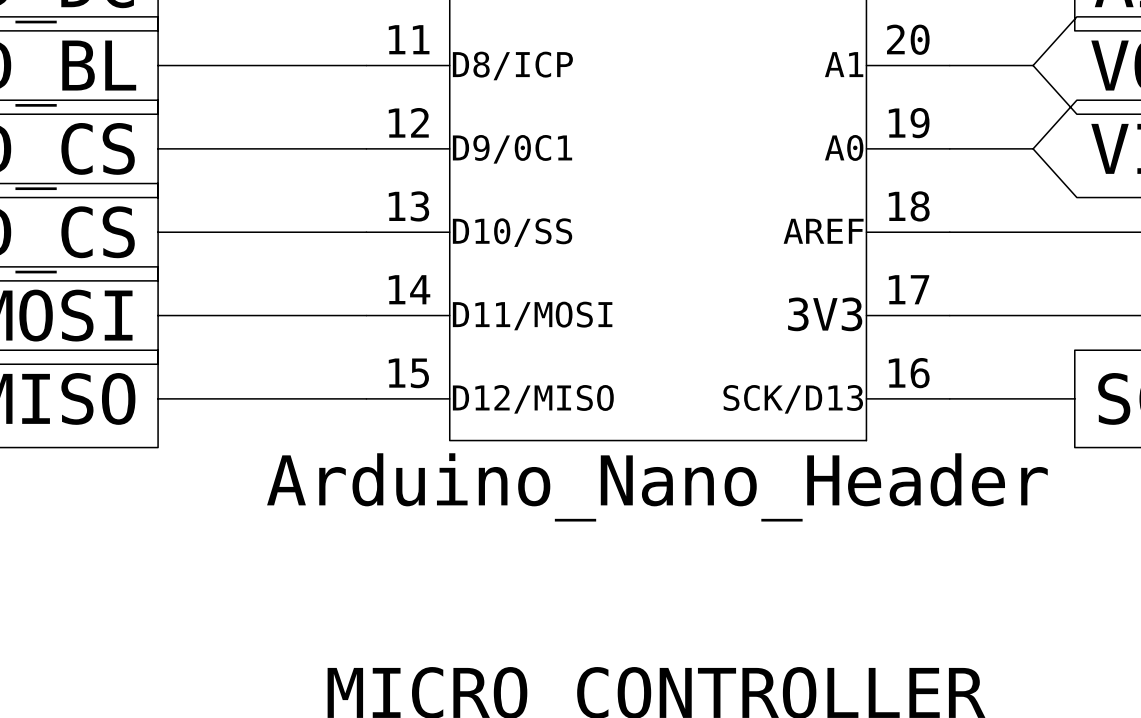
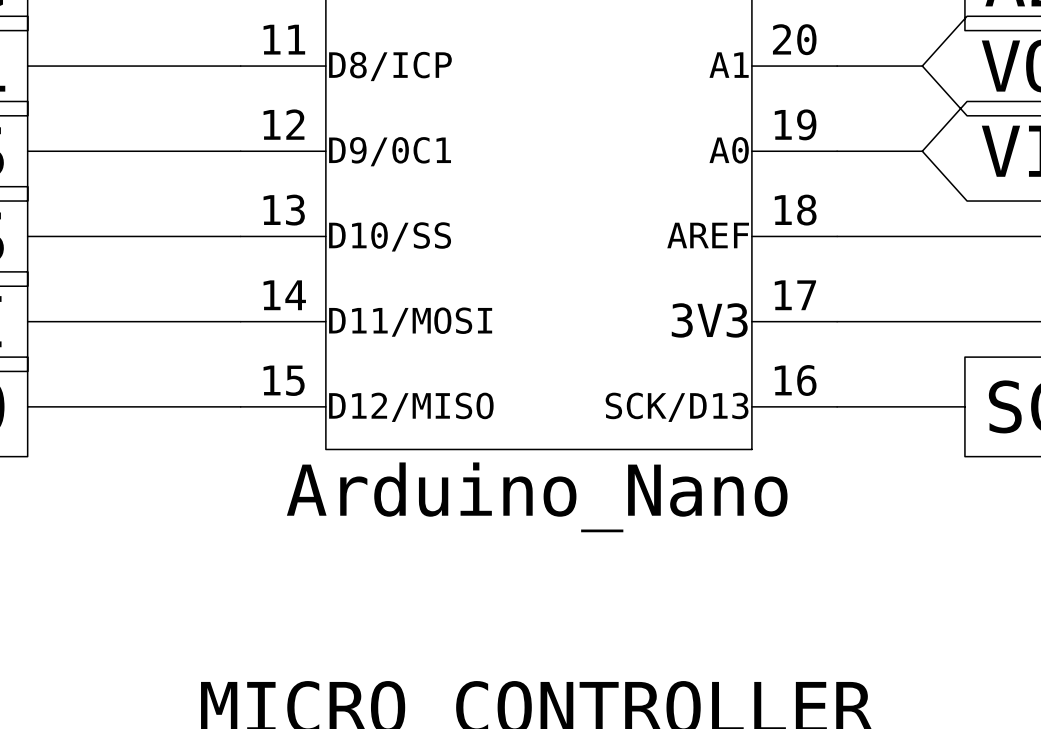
part value: Arduino_Nano_Header (657, 487) -> Arduino_Nano (537, 497)

